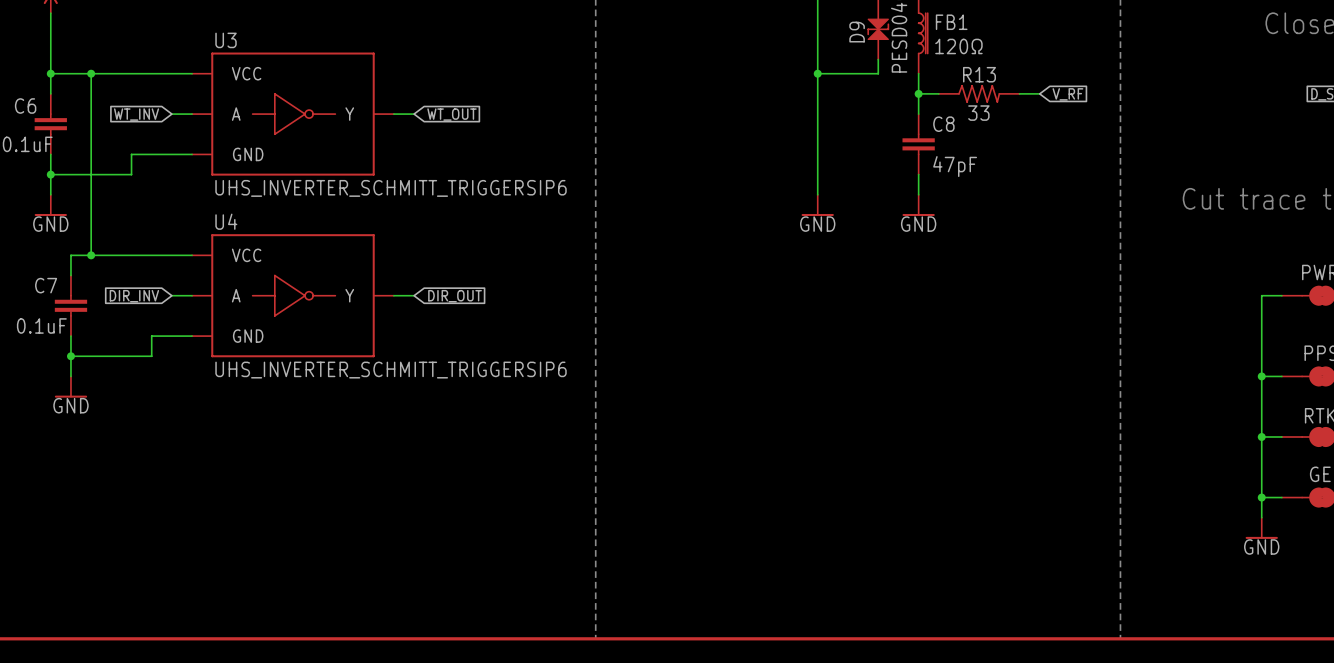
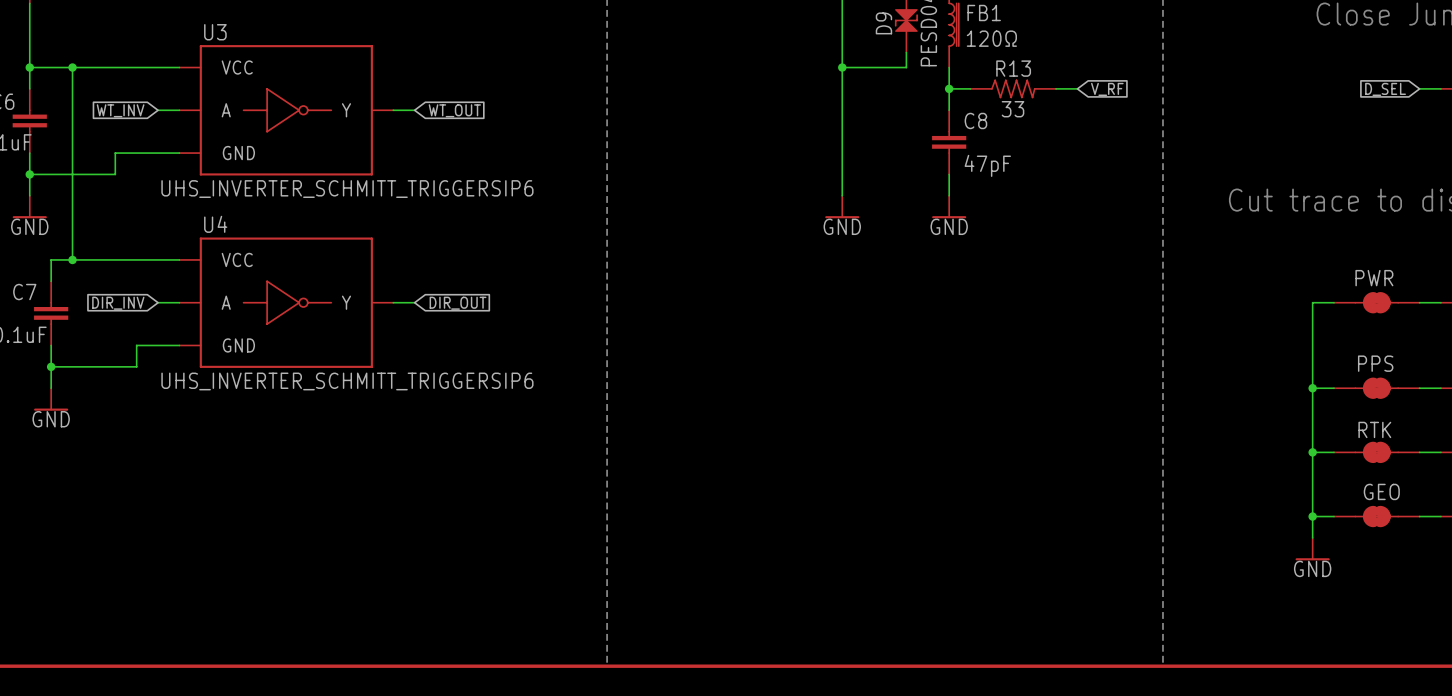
U3 value position: UHS_INVERTER_SCHMITT_TRIGGERSIP6 (391, 188) -> UHS_INVERTER_SCHMITT_TRIGGERSIP6 (347, 189)
U4 value position: UHS_INVERTER_SCHMITT_TRIGGERSIP6 (391, 370) -> UHS_INVERTER_SCHMITT_TRIGGERSIP6 (347, 381)

